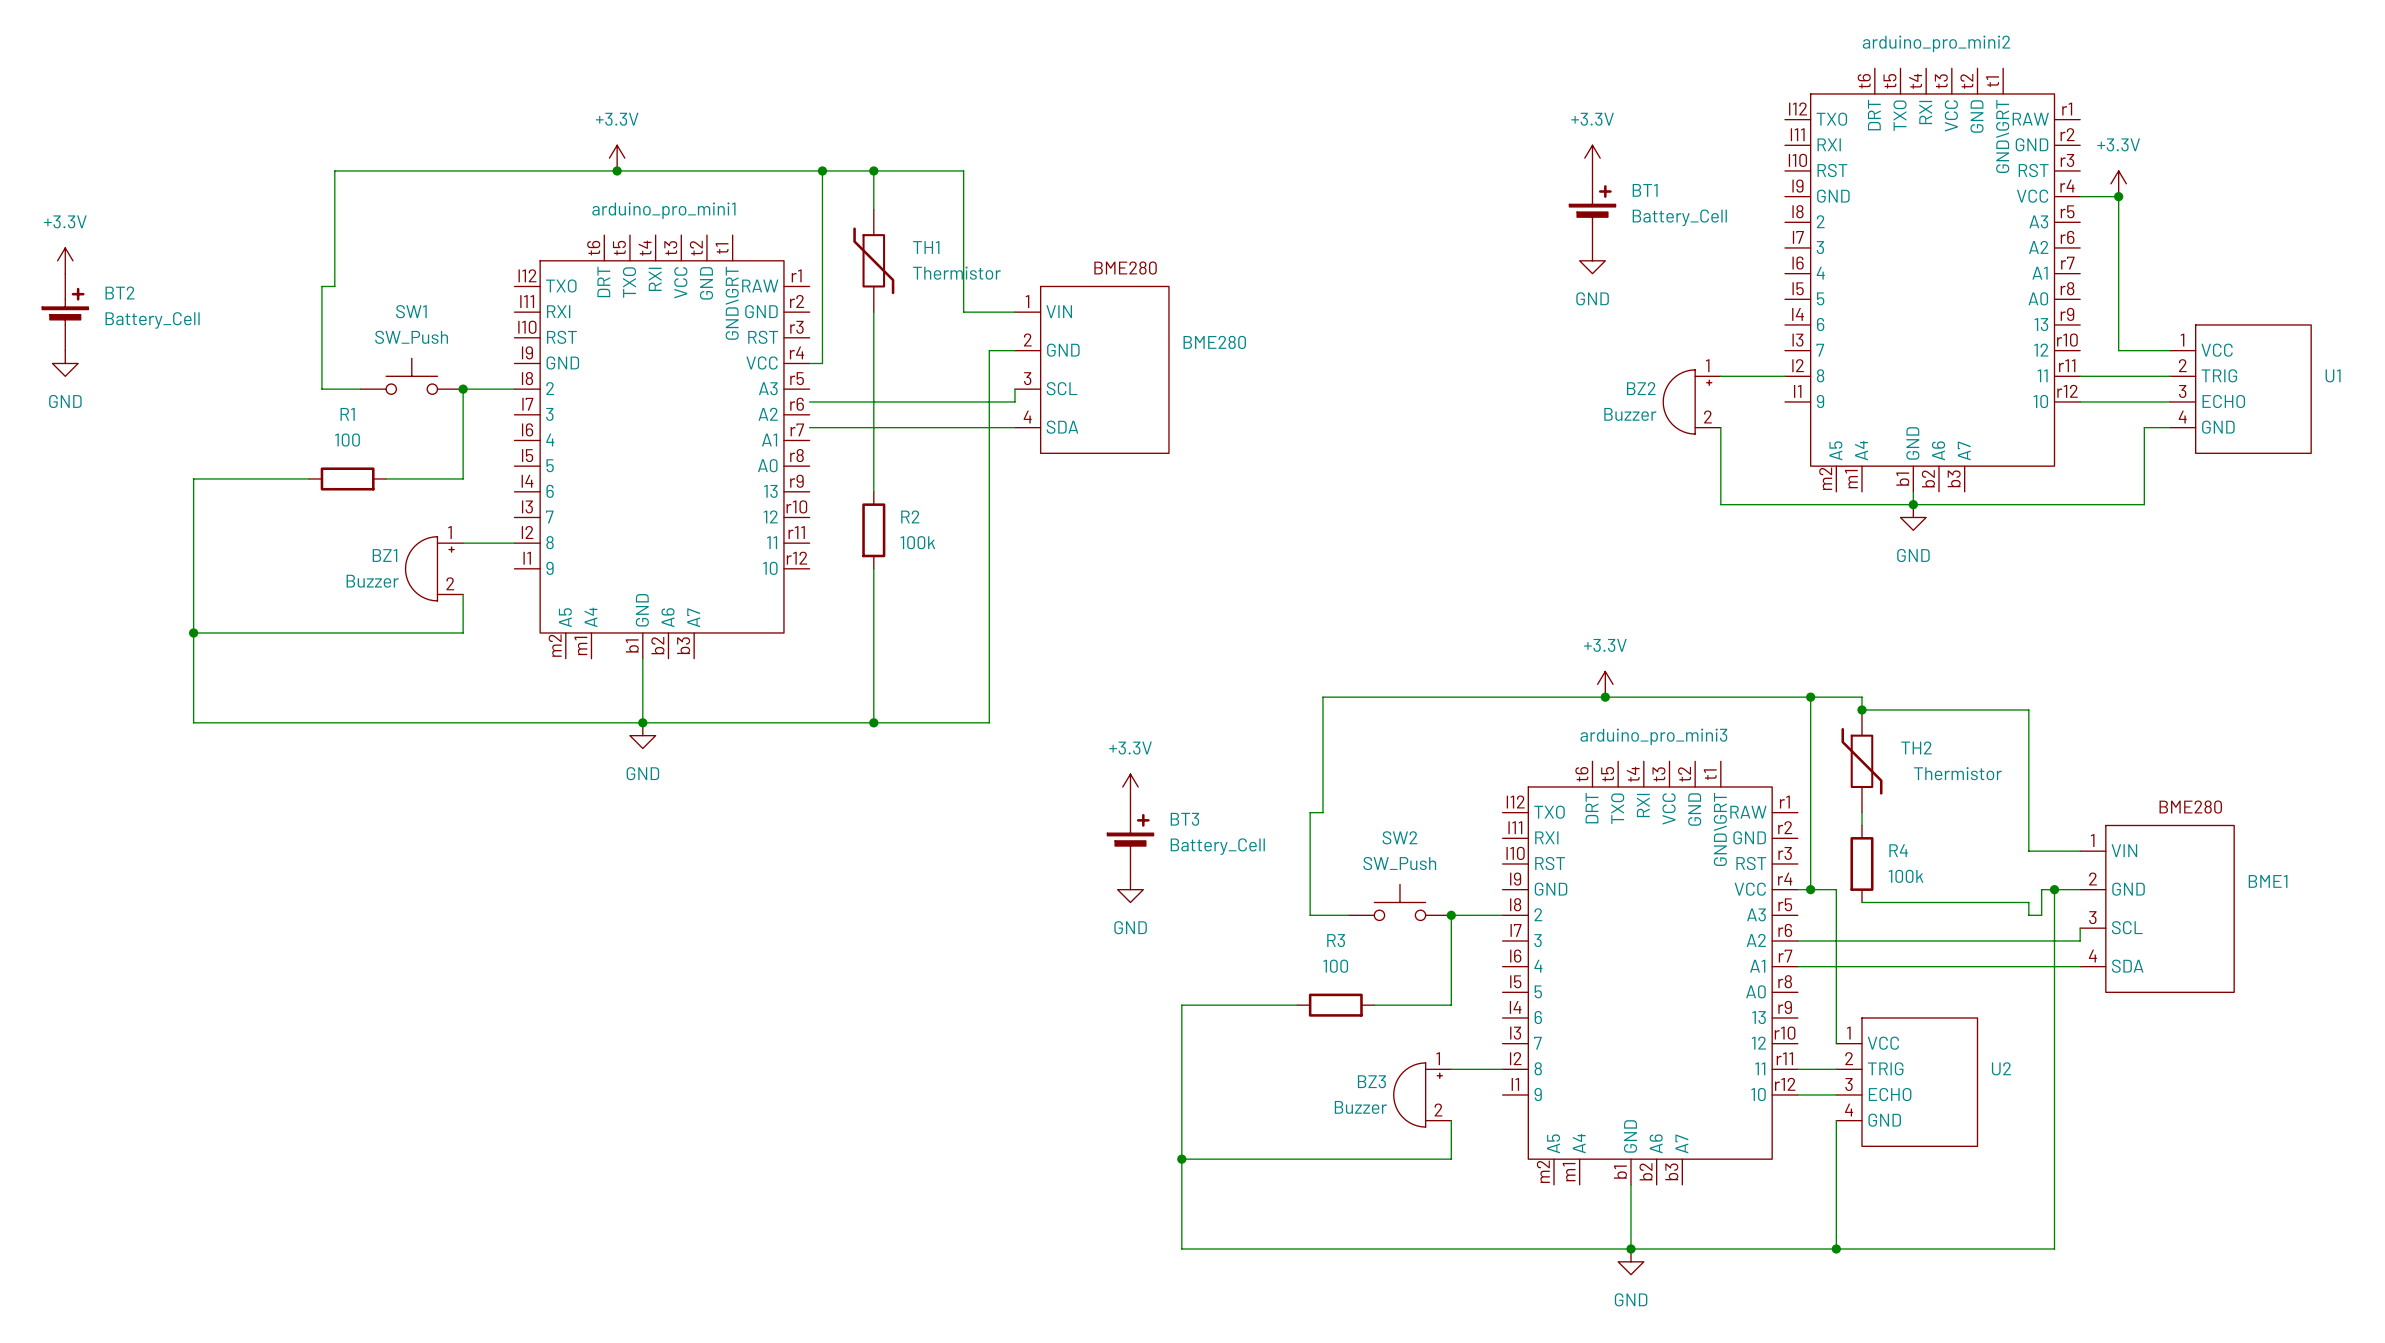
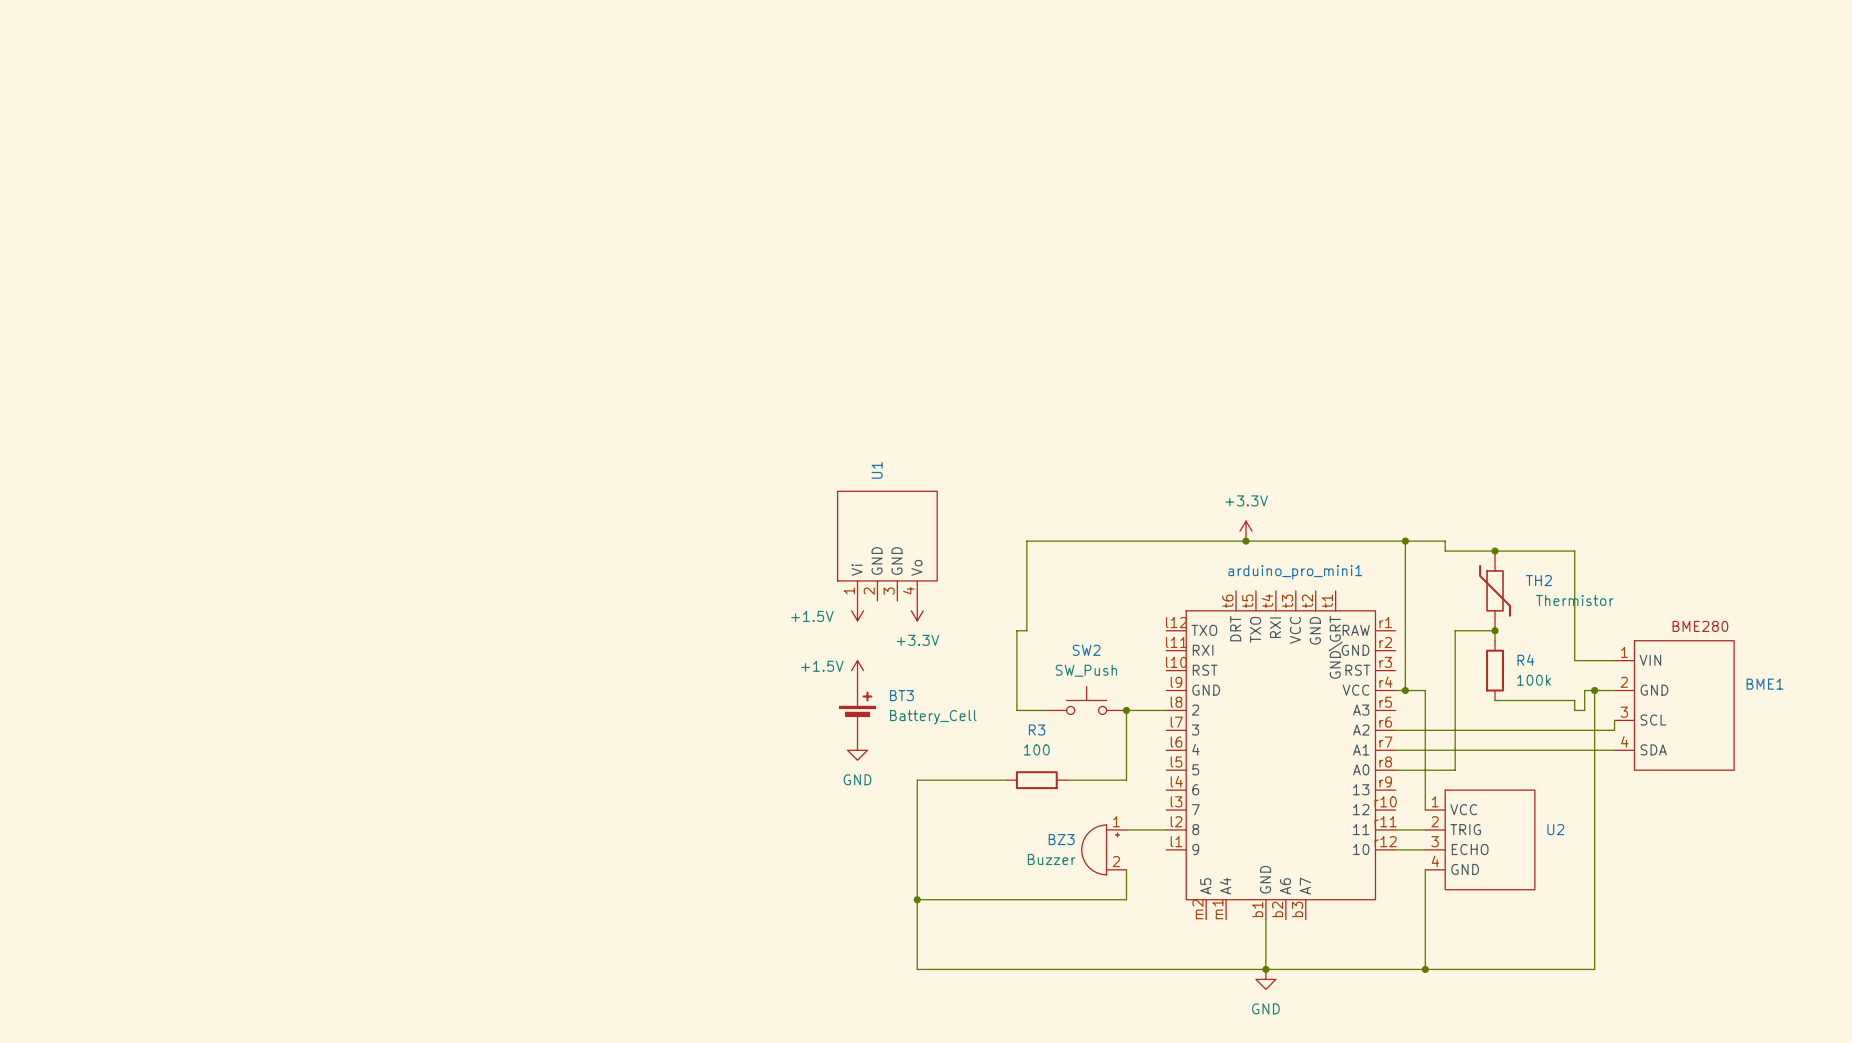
power symbol: +3.3V (617, 158) -> none
power symbol: +3.3V (1592, 158) -> none
junction: (617, 170) -> none
wire: (822, 170) (822, 363) (809, 363) -> none
junction: (822, 170) -> none
wire: (873, 170) (873, 209) -> none
junction: (873, 170) -> none
power symbol: +3.3V (2118, 183) -> none
wire: (2080, 196) (2118, 196) (2118, 350) (2170, 350) -> none
junction: (2118, 196) -> none
BT1: Battery_Cell (1592, 209) -> none
power symbol: +3.3V (65, 260) -> none
TH1: Thermistor (873, 260) -> none
power symbol: GND (1592, 260) -> none
arduino_pro_mini2: (1932, 280) -> none
BT2: Battery_Cell (65, 312) -> none
wire: (873, 312) (873, 491) -> none
wire: (1014, 312) (963, 312) (963, 170) (334, 170) (334, 286) (321, 286) (321, 389) (360, 389) -> none
U1 symbol: [2170, 324, 2312, 454] -> [837, 491, 938, 601]
wire: (1014, 350) (989, 350) (989, 722) (193, 722) (193, 478) (309, 478) -> none
power symbol: GND (65, 363) -> none
BME280: (1091, 369) -> none
U1 name position: U1 (2333, 375) -> U1 (877, 470)
SW1: SW_Push (411, 376) -> none
wire: (1720, 376) (1784, 376) -> none
wire: (2080, 376) (2170, 376) -> none
junction: (463, 389) -> none
wire: (514, 389) (463, 389) (463, 478) (386, 478) -> none
wire: (1014, 389) (1014, 401) (809, 401) -> none
BZ2: Buzzer (1692, 401) -> none
wire: (2080, 401) (2170, 401) -> none
wire: (809, 427) (1014, 427) -> none
wire: (1720, 427) (1720, 504) (2144, 504) (2144, 427) (2170, 427) -> none
arduino_pro_mini1: (662, 446) -> none
R1: 100 (347, 478) -> none
wire: (1913, 491) (1913, 504) -> none
junction: (1913, 504) -> none
power symbol: GND (1913, 517) -> none
R2: 100k (873, 530) -> none
wire: (463, 543) (514, 543) -> none
BZ1: Buzzer (434, 568) -> none
wire: (873, 568) (873, 722) -> none
wire: (463, 594) (463, 632) (193, 632) -> none
junction: (193, 632) -> none
wire: (642, 658) (642, 722) -> none
junction: (1861, 709) -> none
junction: none -> (1495, 551)
junction: (642, 722) -> none
junction: (873, 722) -> none
power symbol: GND (642, 735) -> none
arduino_pro_mini3 name: arduino_pro_mini3 (1653, 736) -> arduino_pro_mini1 (1295, 572)
TH2 position: (1861, 761) -> (1495, 590)
power symbol: none -> +1.5V (857, 610)
power symbol rotation: 0° (1130, 786) -> 180° (917, 610)
power symbol position: +3.3V (1130, 786) -> +3.3V (917, 610)
wire: (1861, 812) (1861, 825) -> none
junction: none -> (1495, 630)
wire: none -> (1495, 640) (1495, 630) (1455, 630) (1455, 770) (1395, 770)
BT3 position: (1130, 838) -> (857, 710)
power symbol: none -> +1.5V (857, 670)
R4 position: (1861, 863) -> (1495, 670)
power symbol position: GND (1130, 889) -> GND (857, 750)
wire: (1861, 902) (1926, 902) -> none

